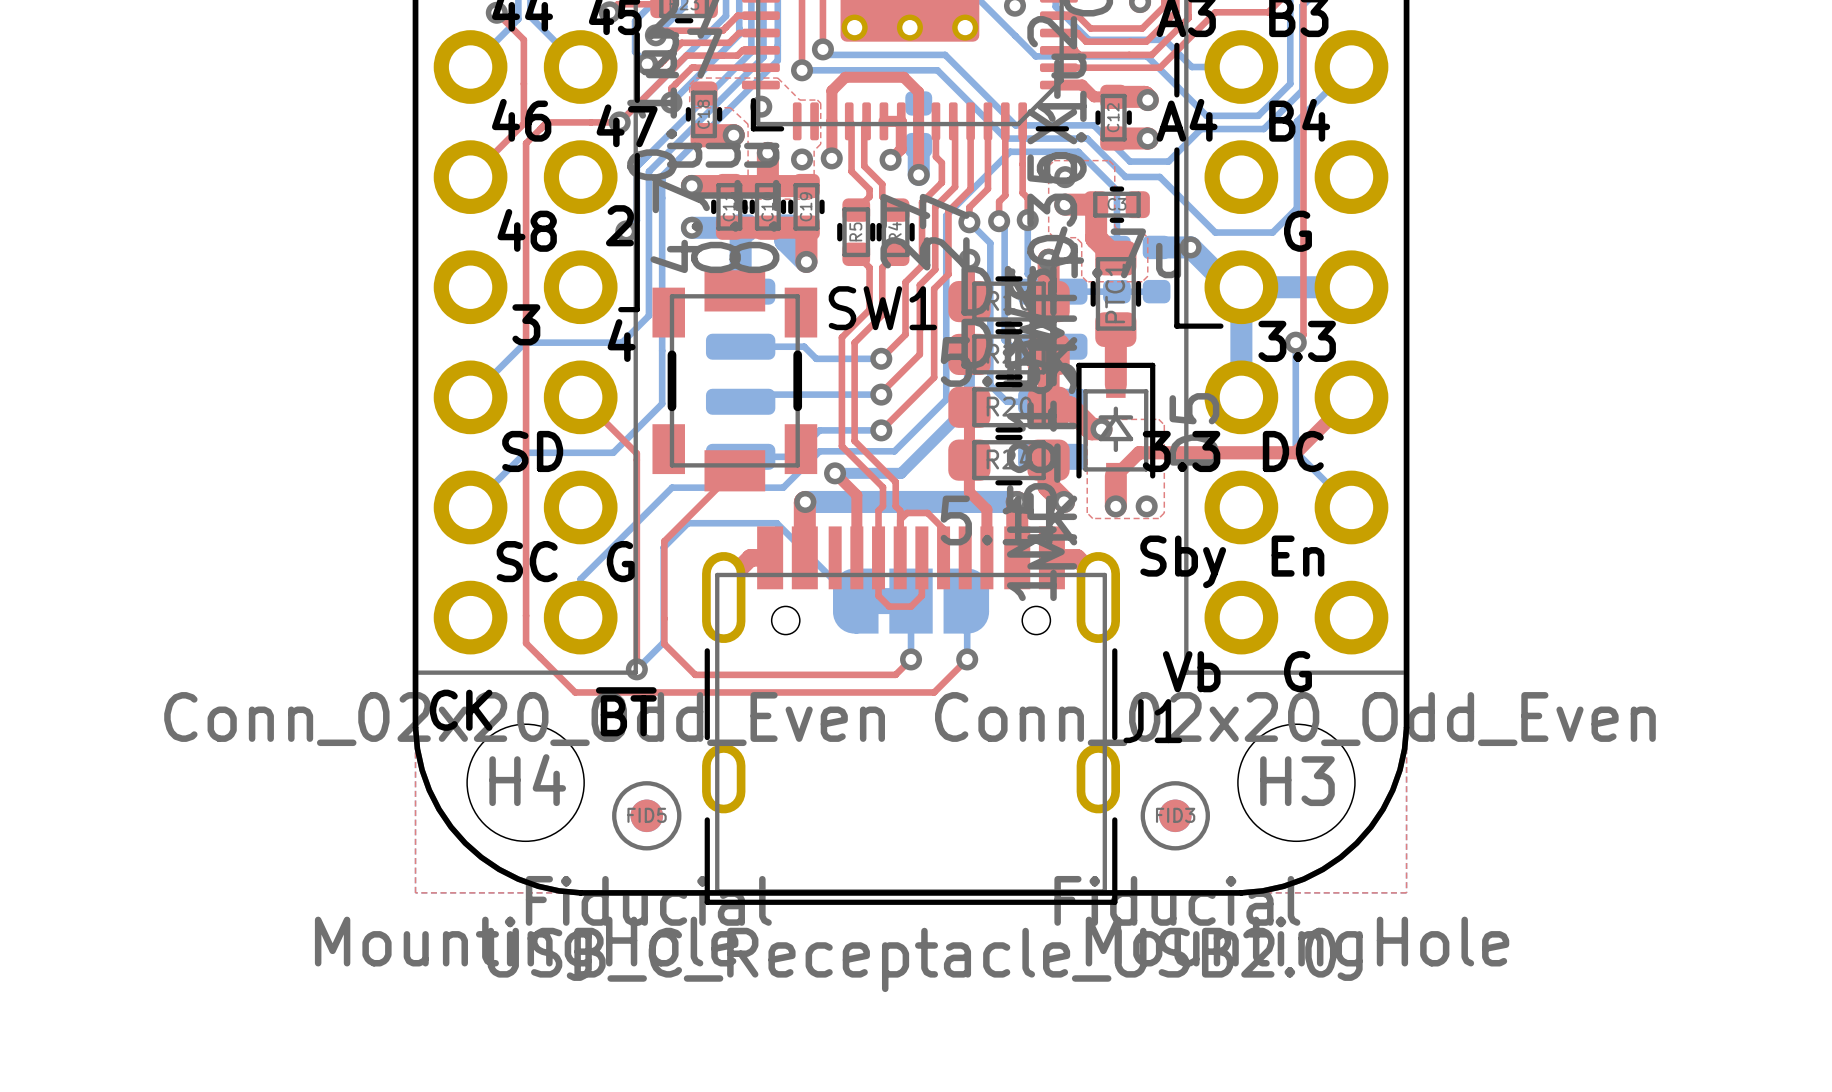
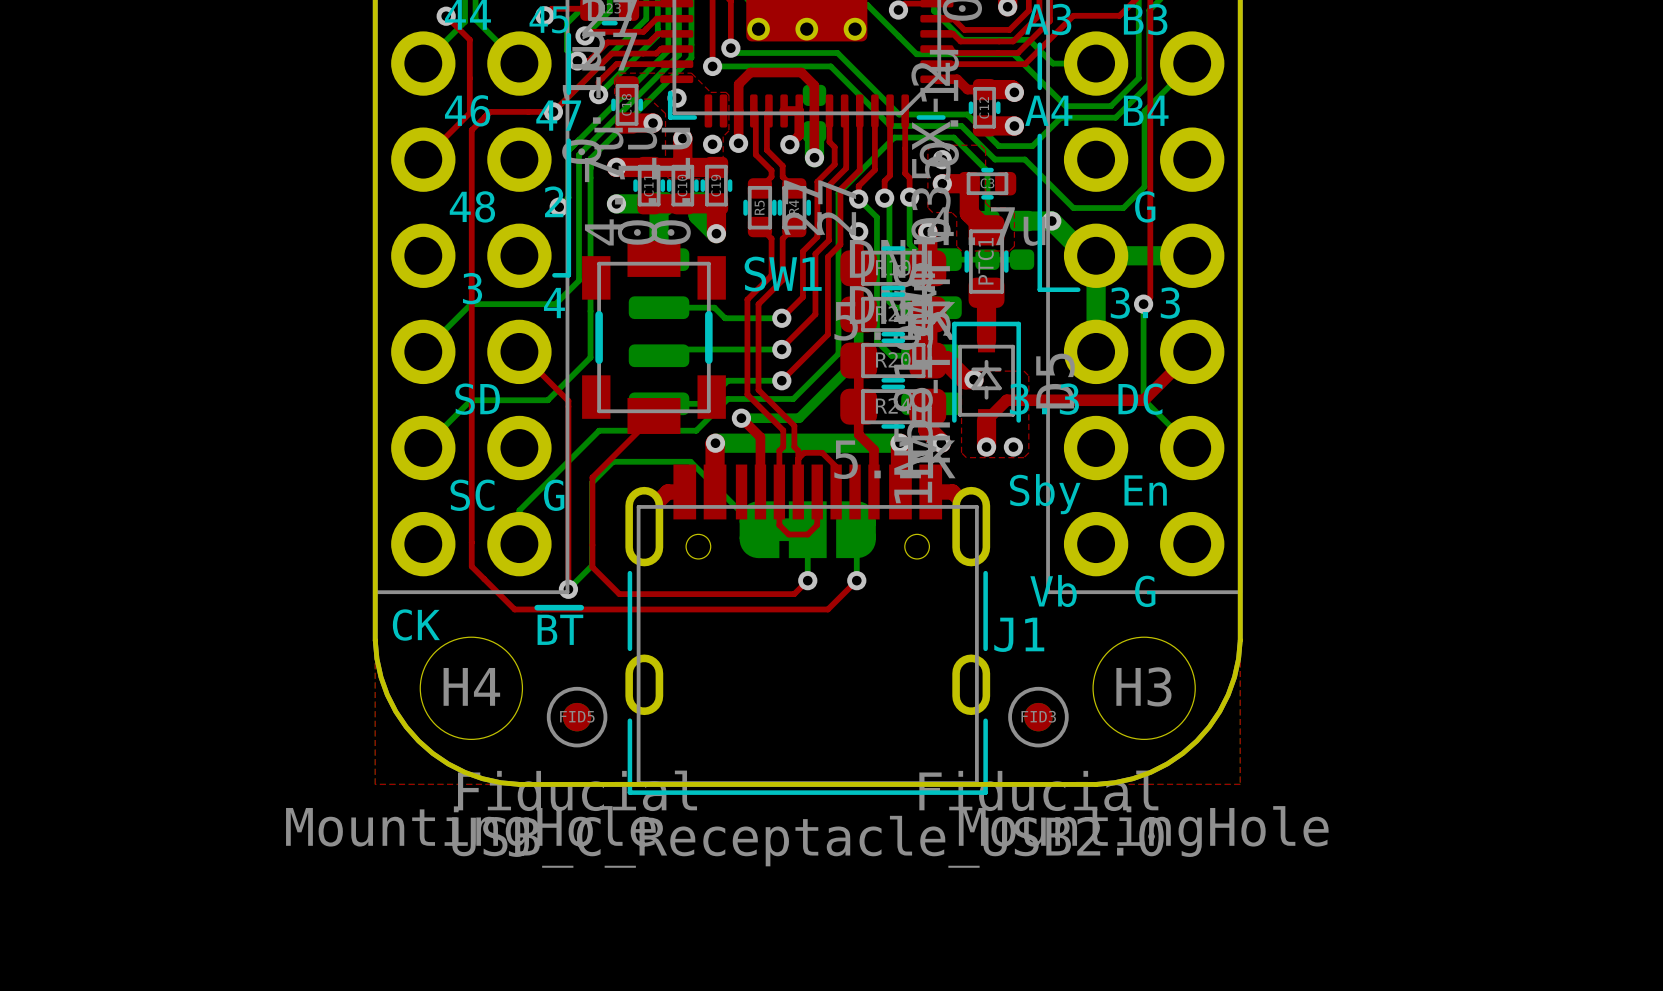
part value: Conn_02x20_Odd_Even (524, 719) -> none
part value: Conn_02x20_Odd_Even (1295, 719) -> none

